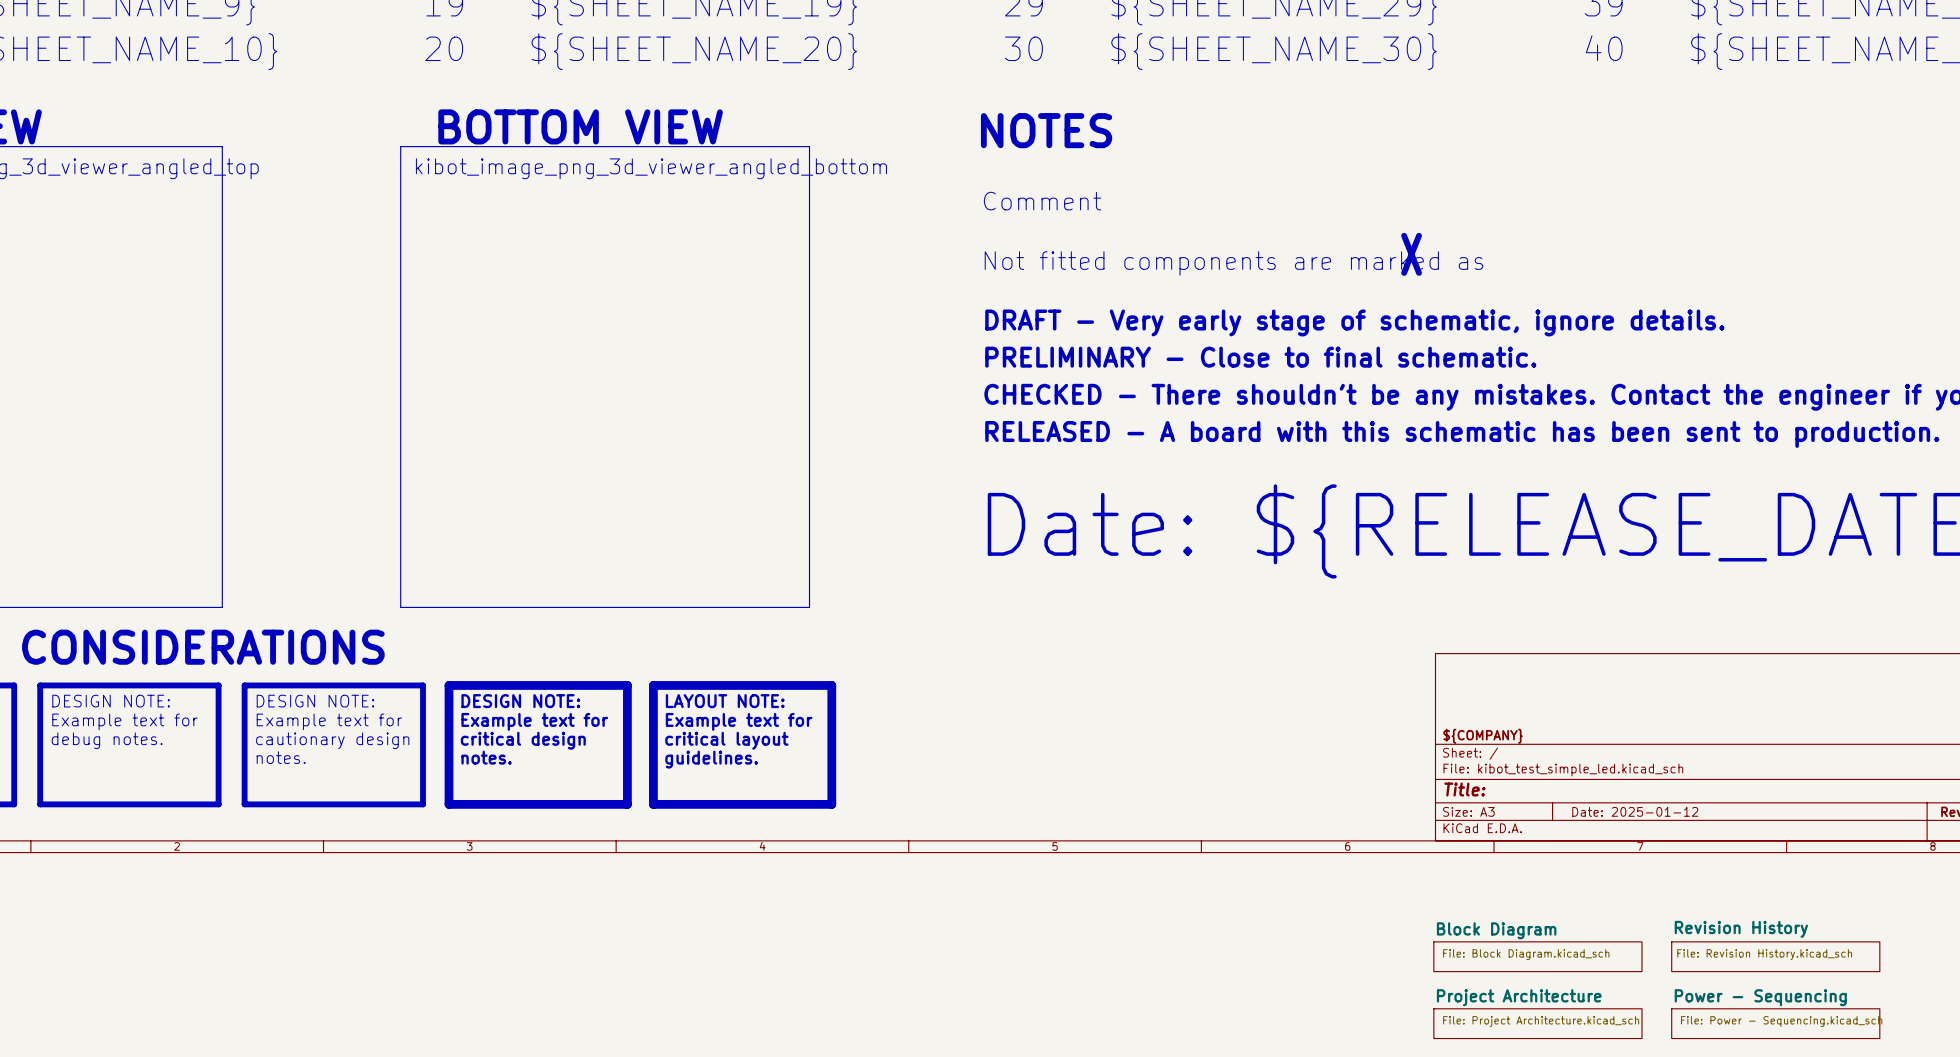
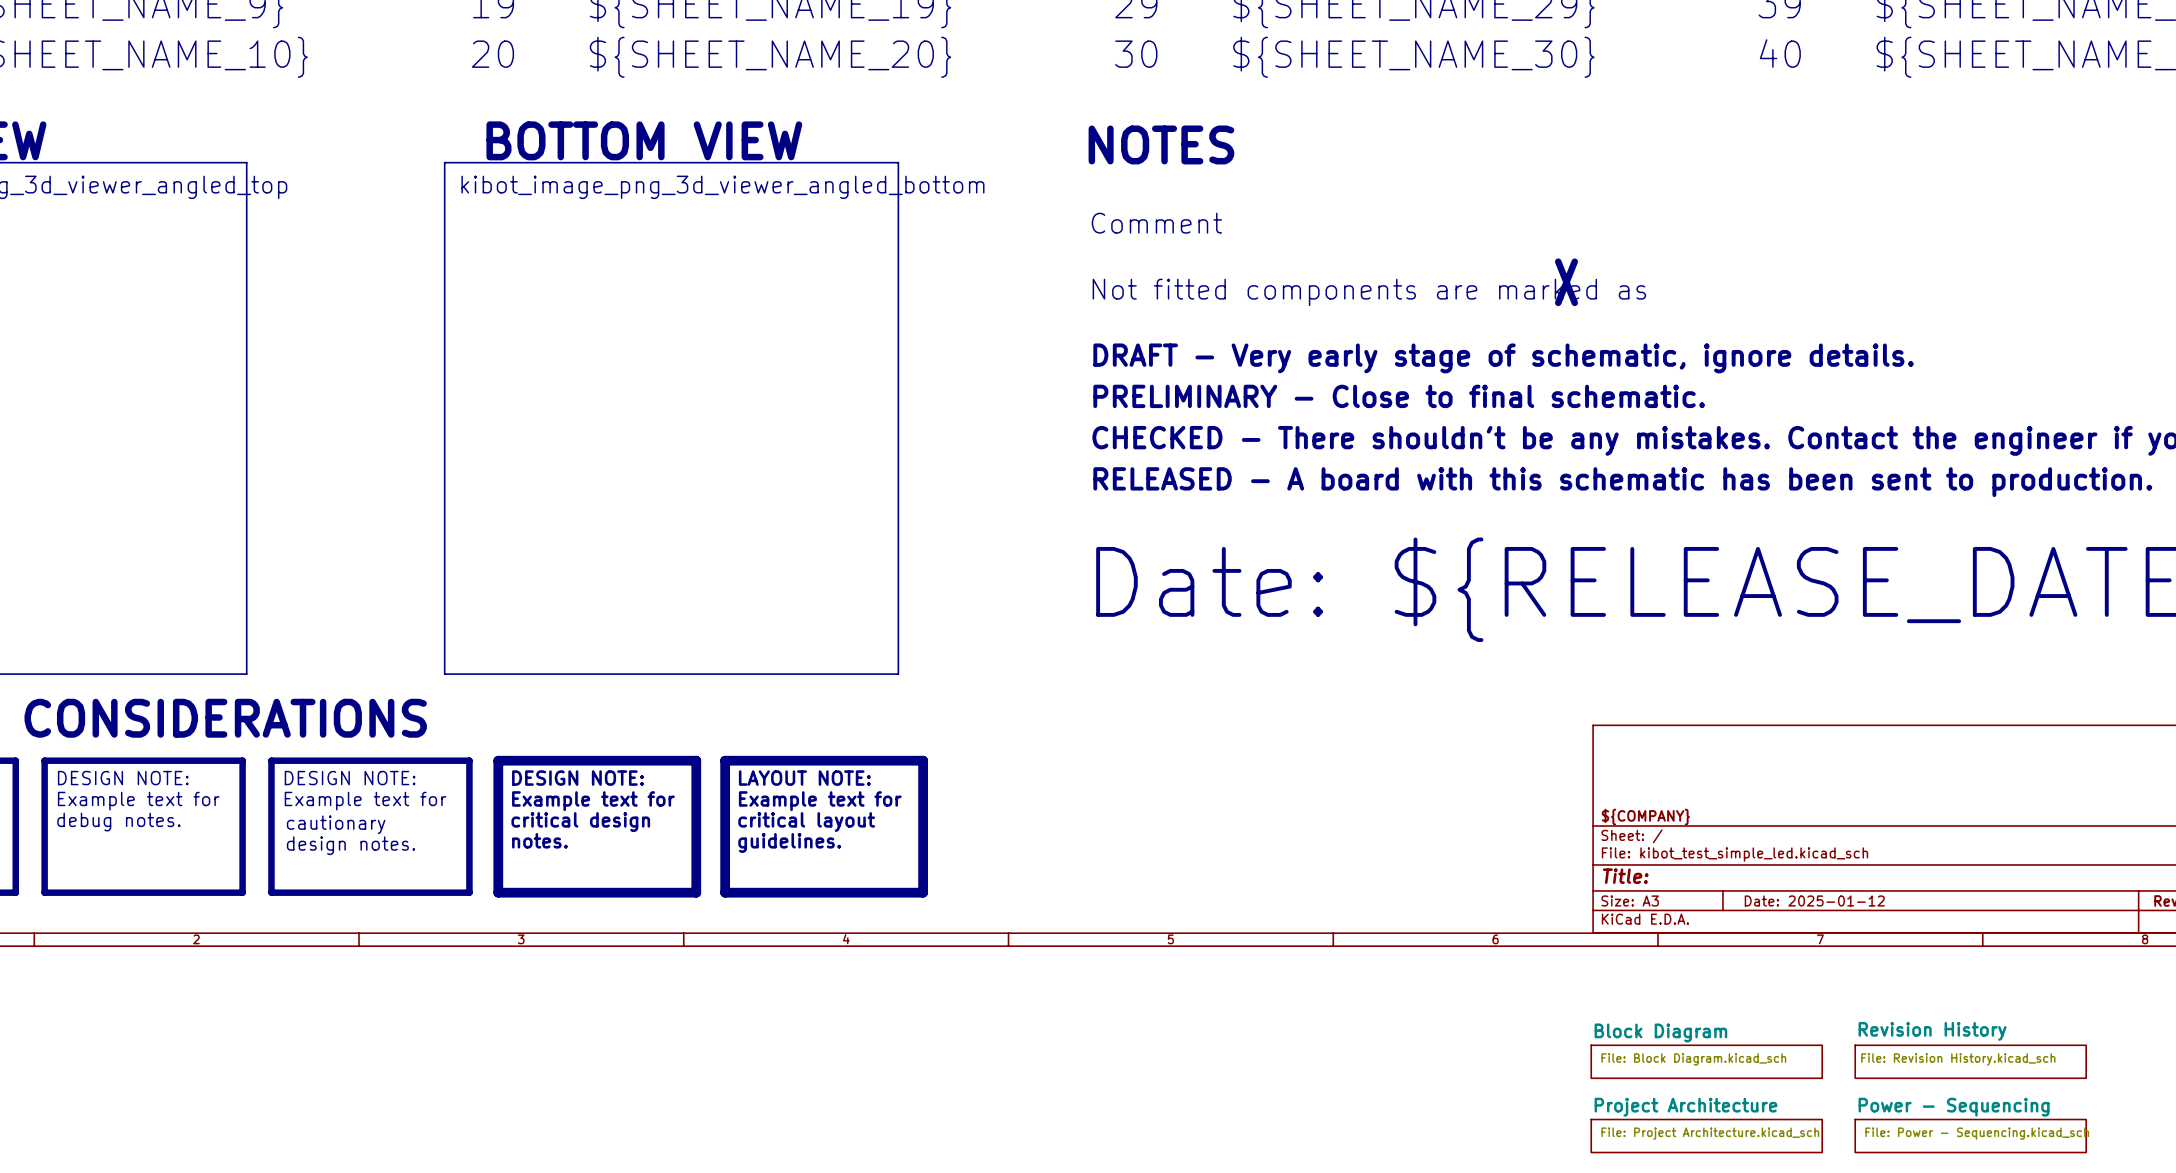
text: cautionary design (332, 740) -> cautionary (336, 824)
text: notes. (281, 757) -> design notes. (350, 845)

